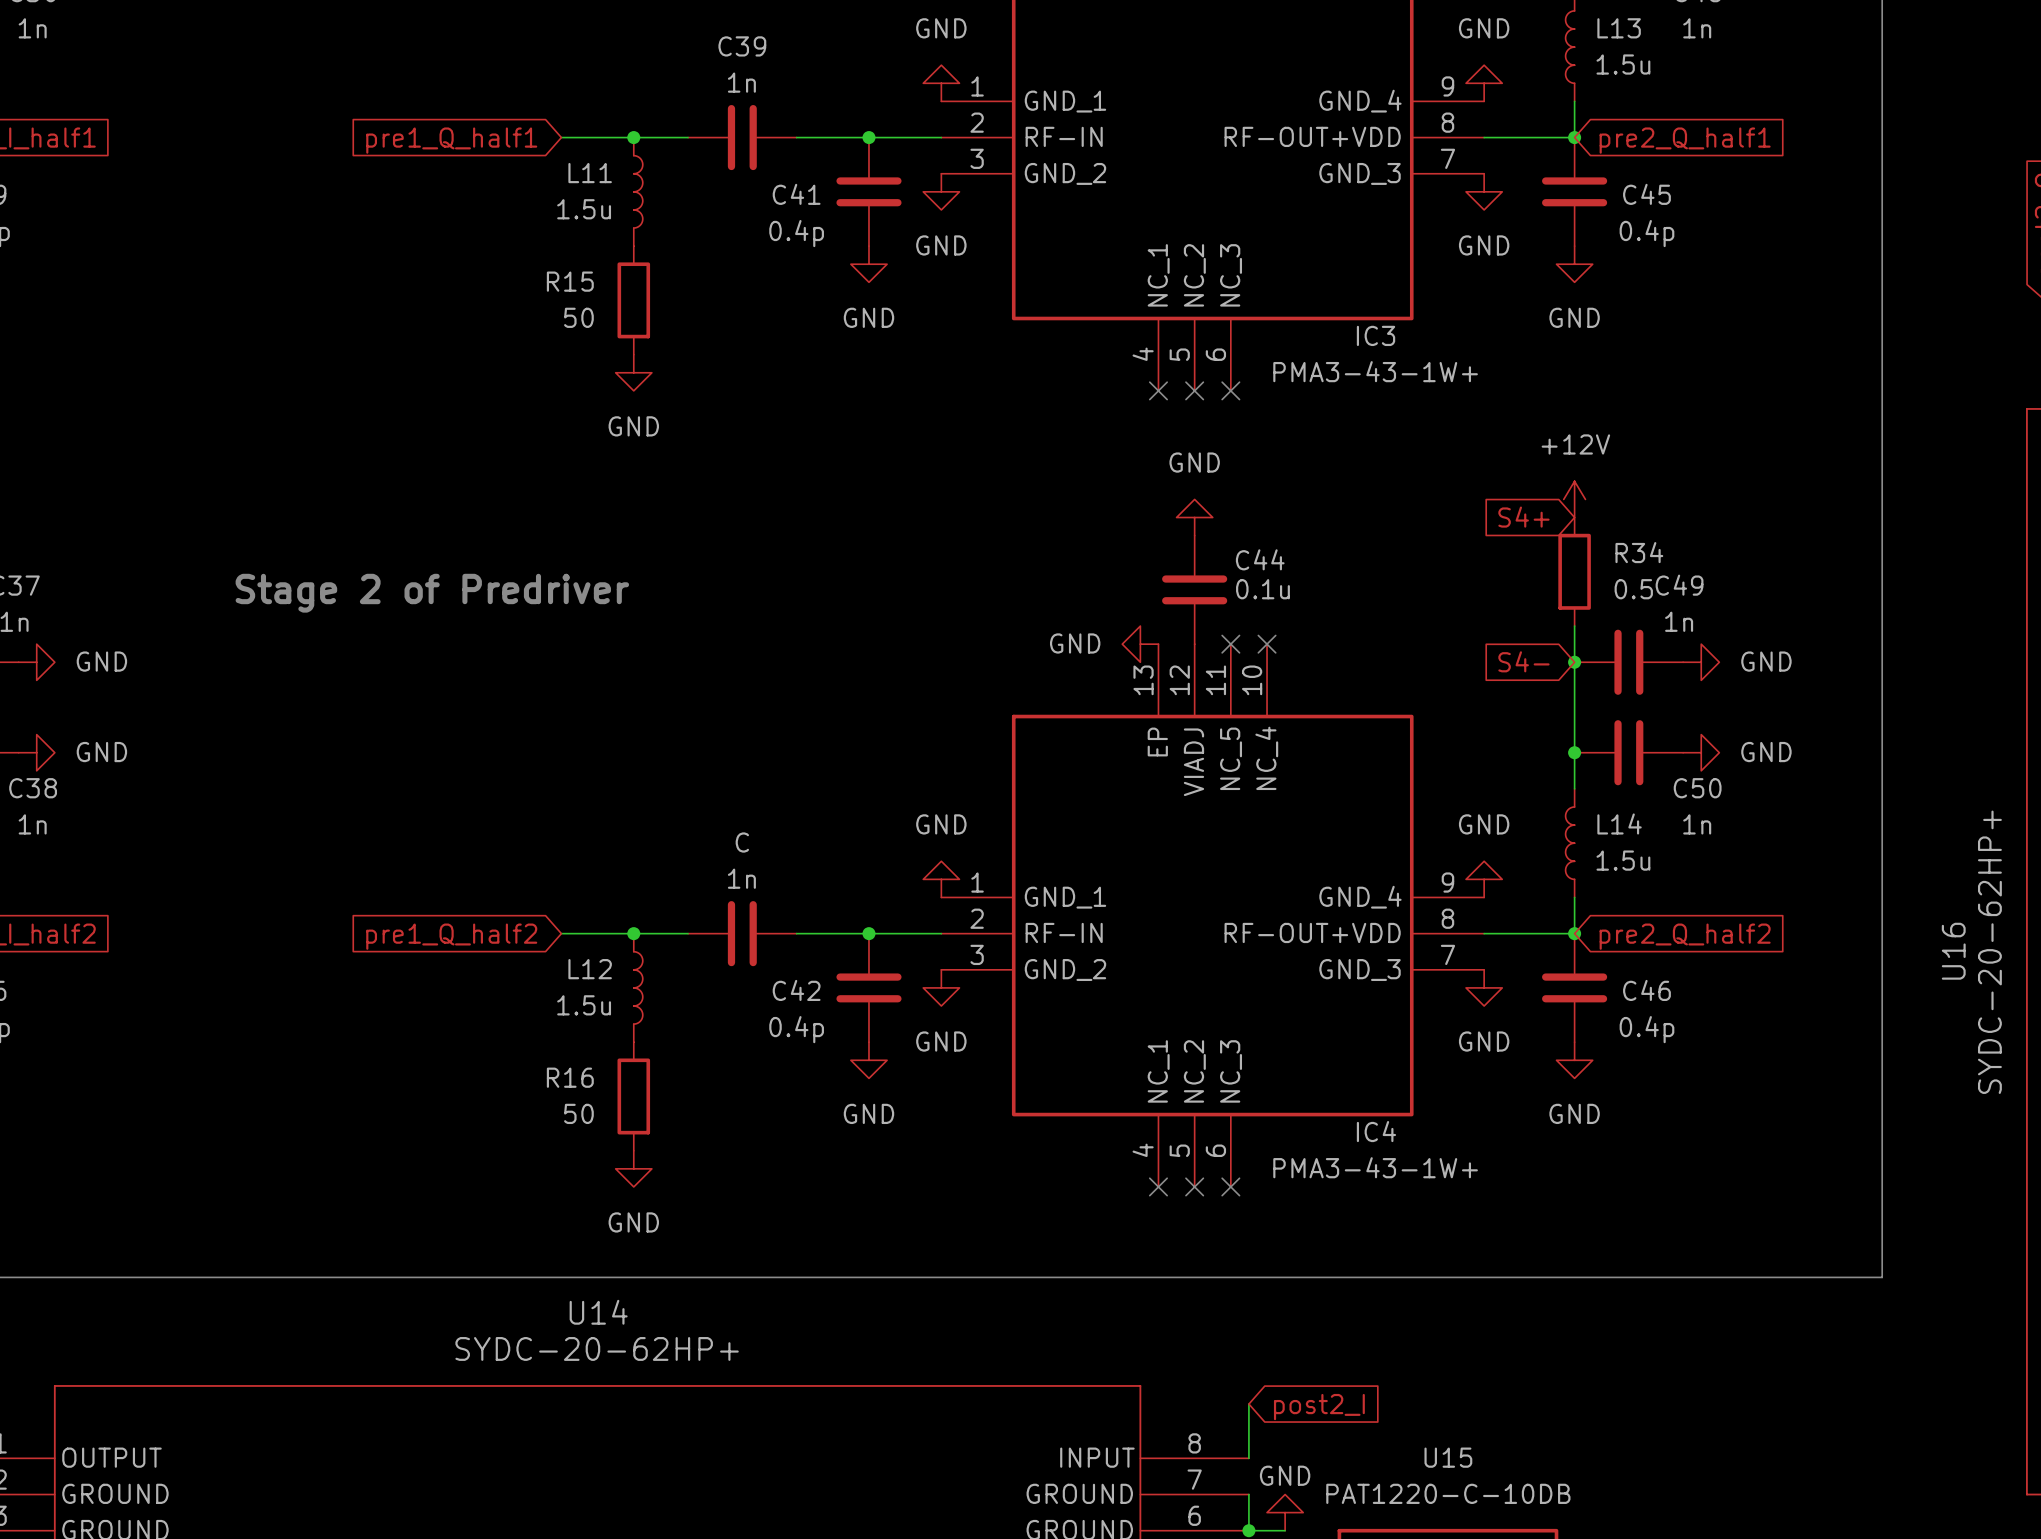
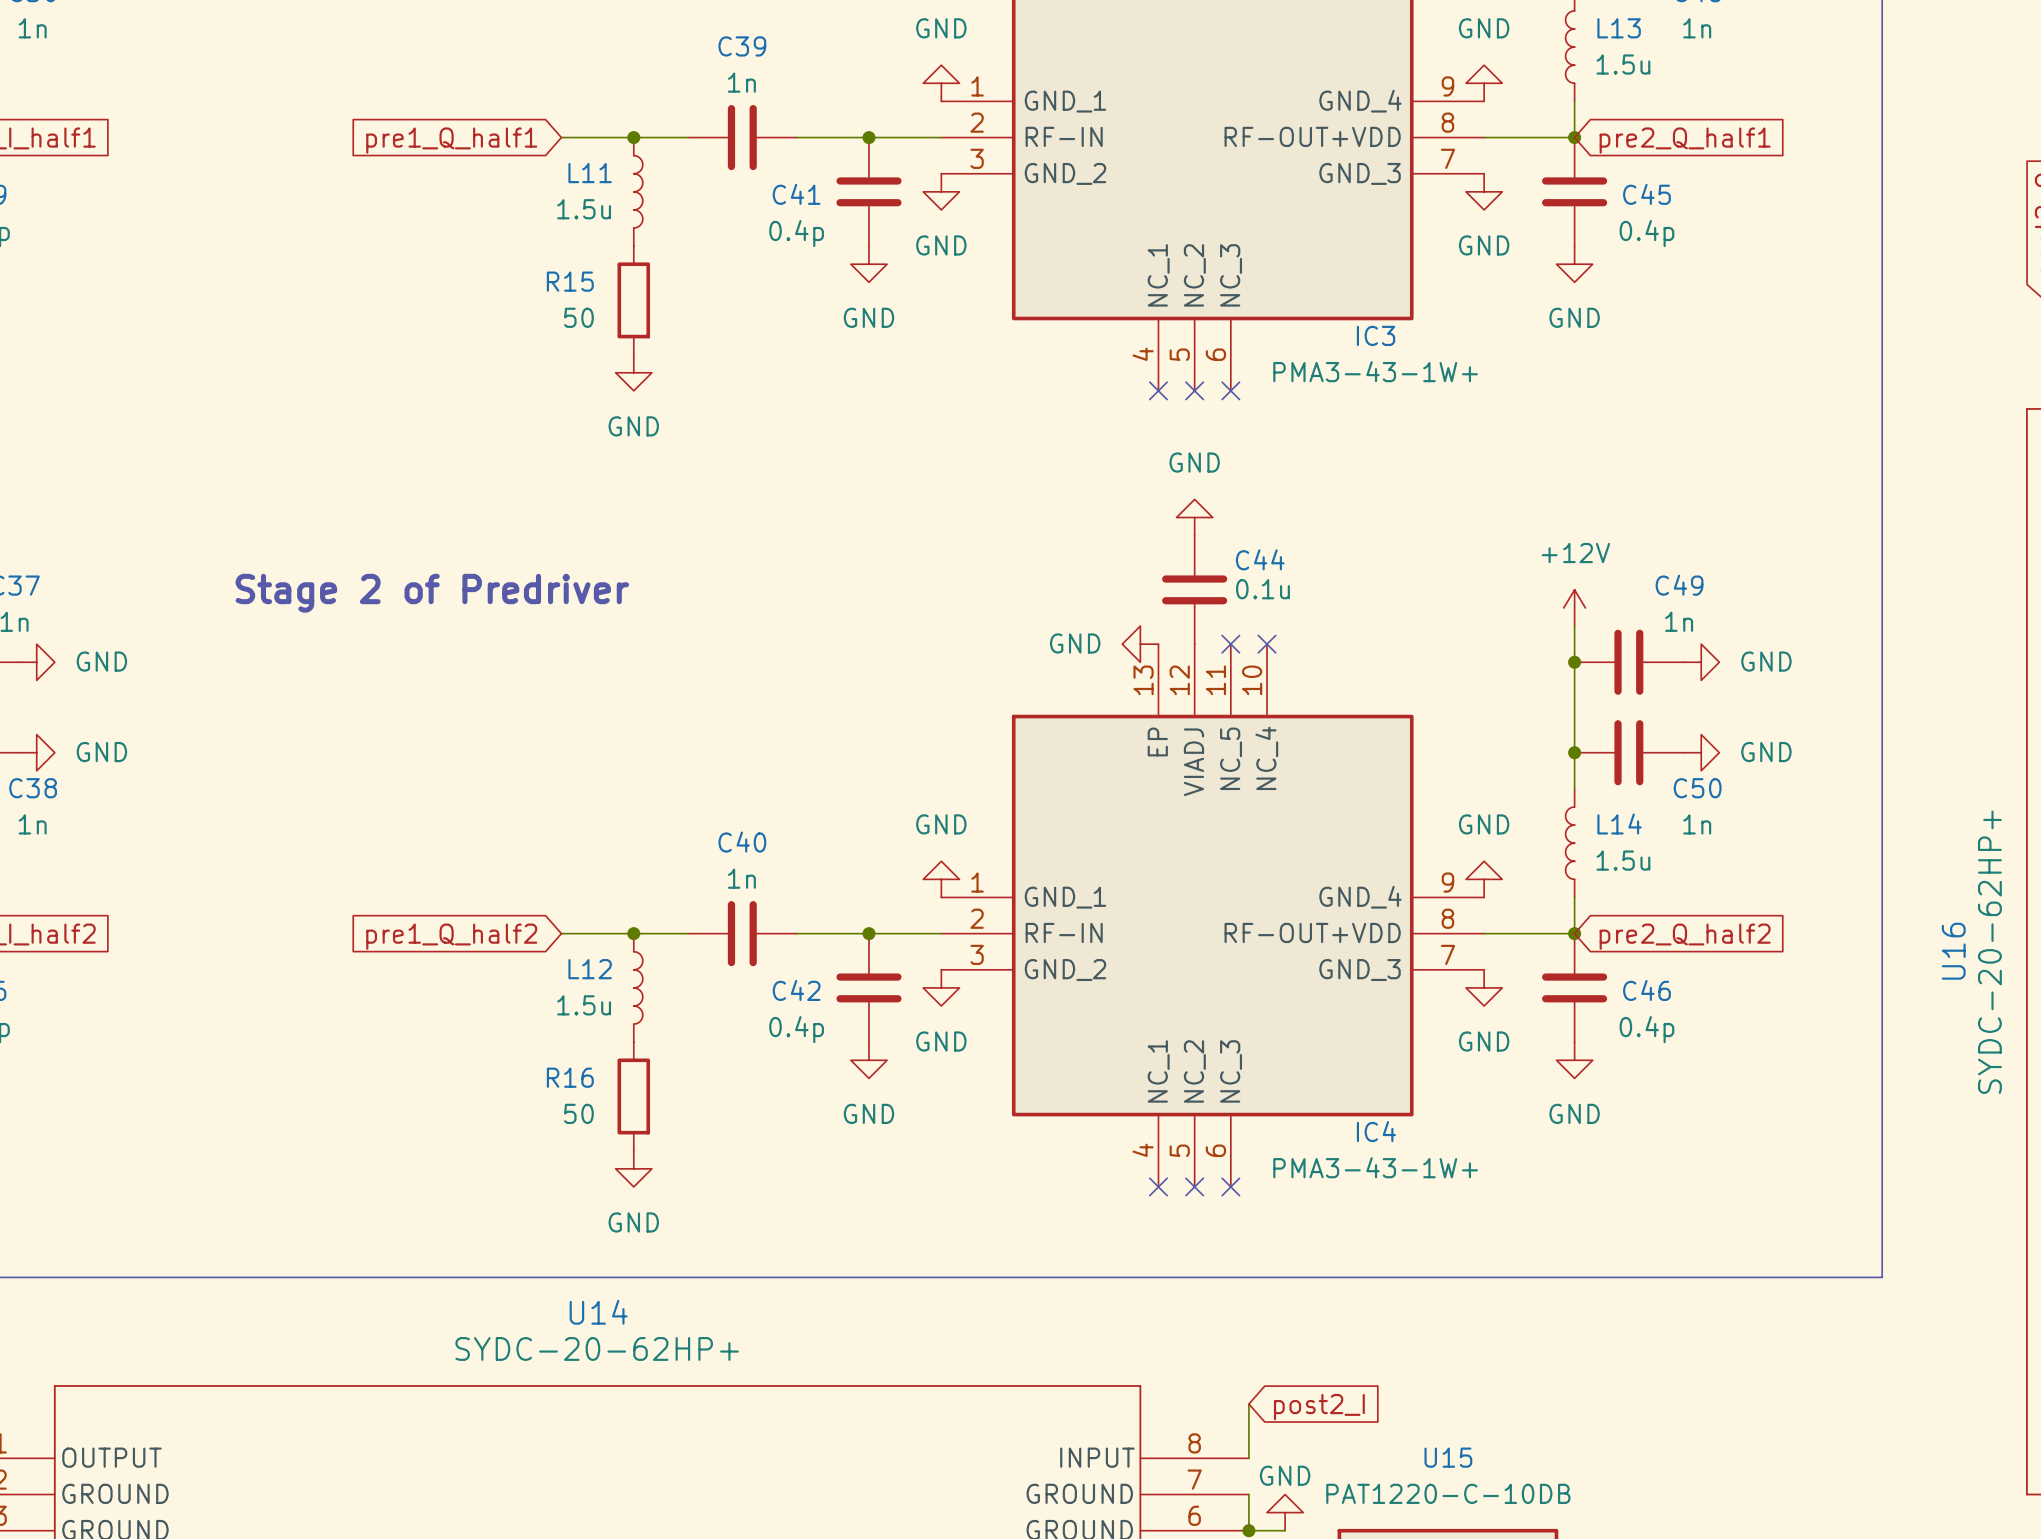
power symbol position: +12V (1574, 499) -> +12V (1574, 607)
global label: S4+ (1523, 517) -> none
R34: 0.5 (1574, 571) -> none
global label: S4- (1523, 661) -> none
C name: C (742, 842) -> C40 (742, 842)

